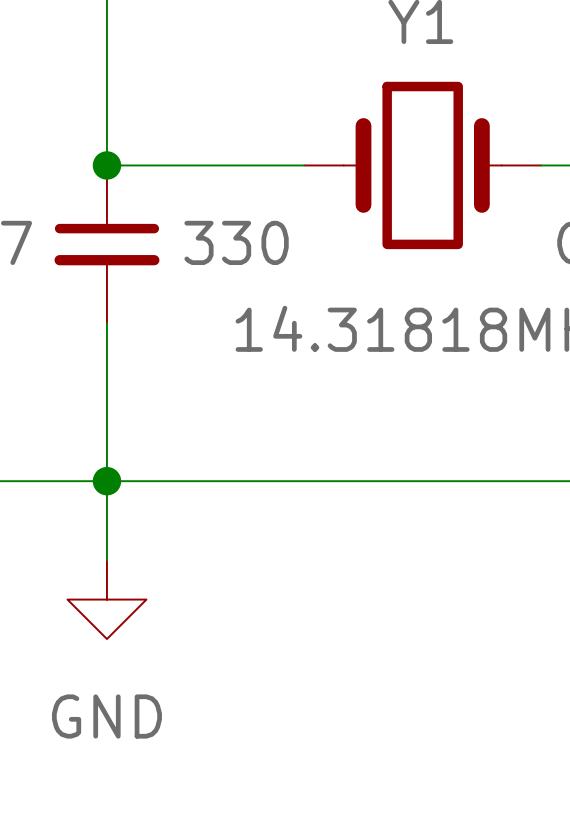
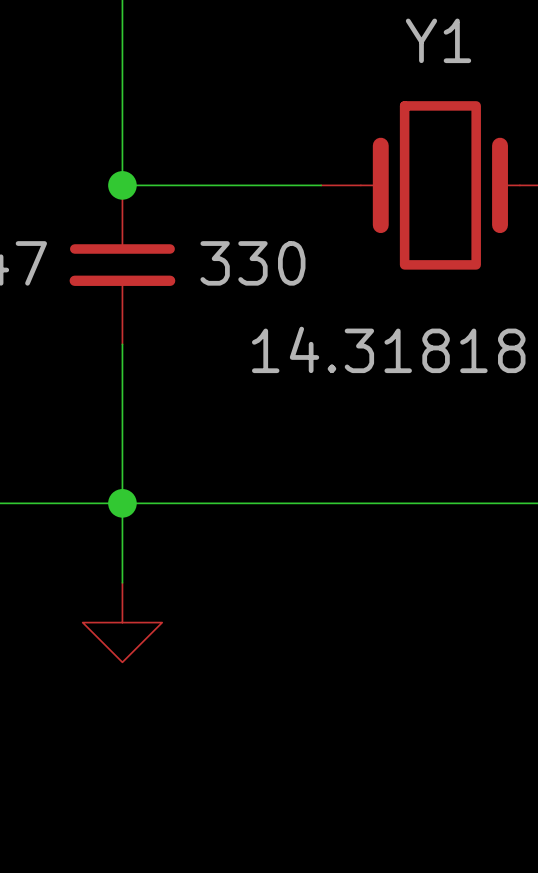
power symbol text: GND (106, 716) -> none

